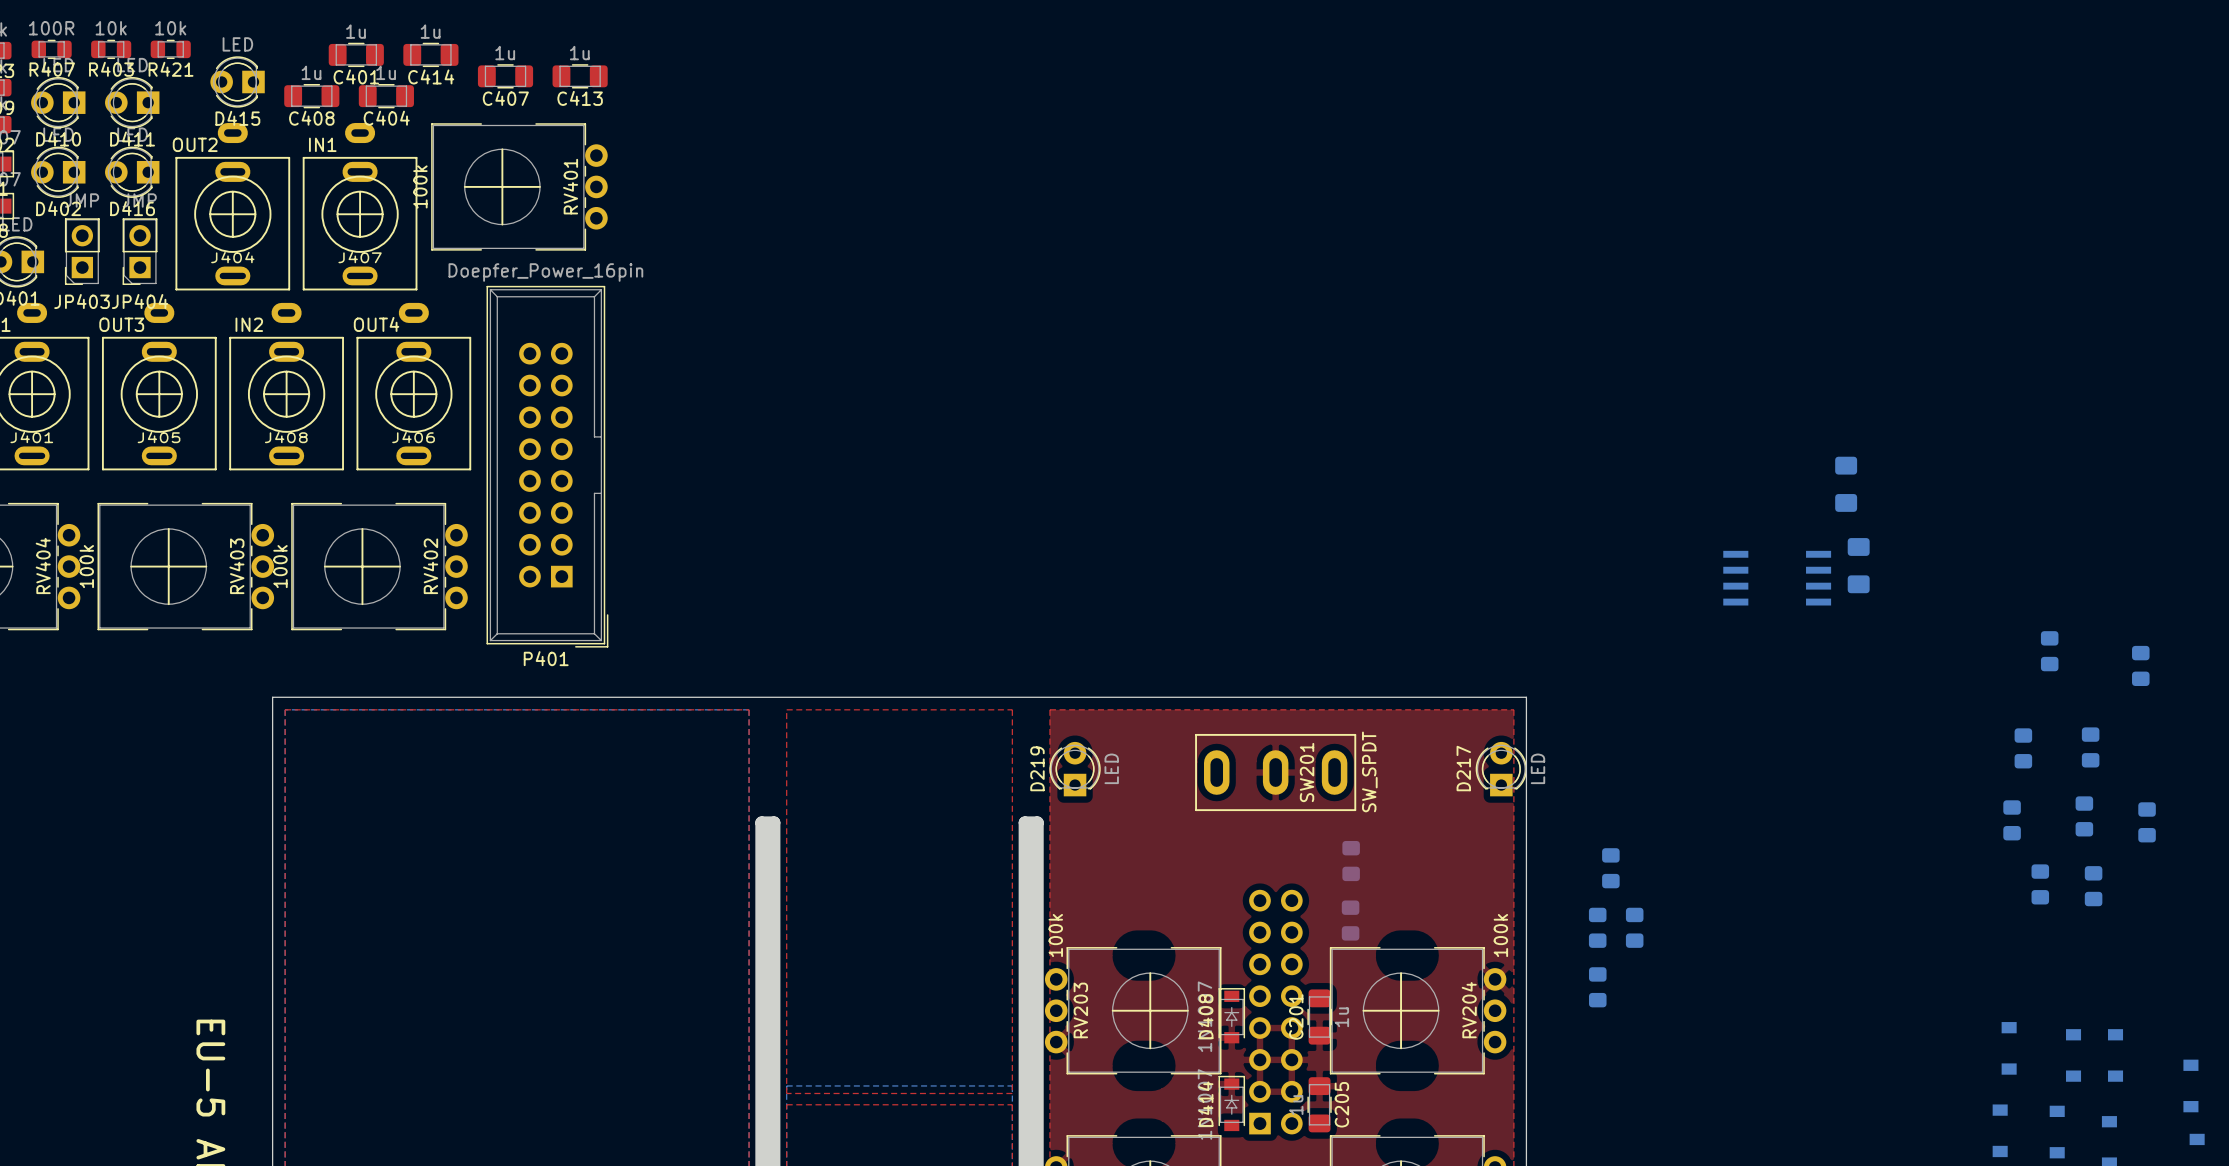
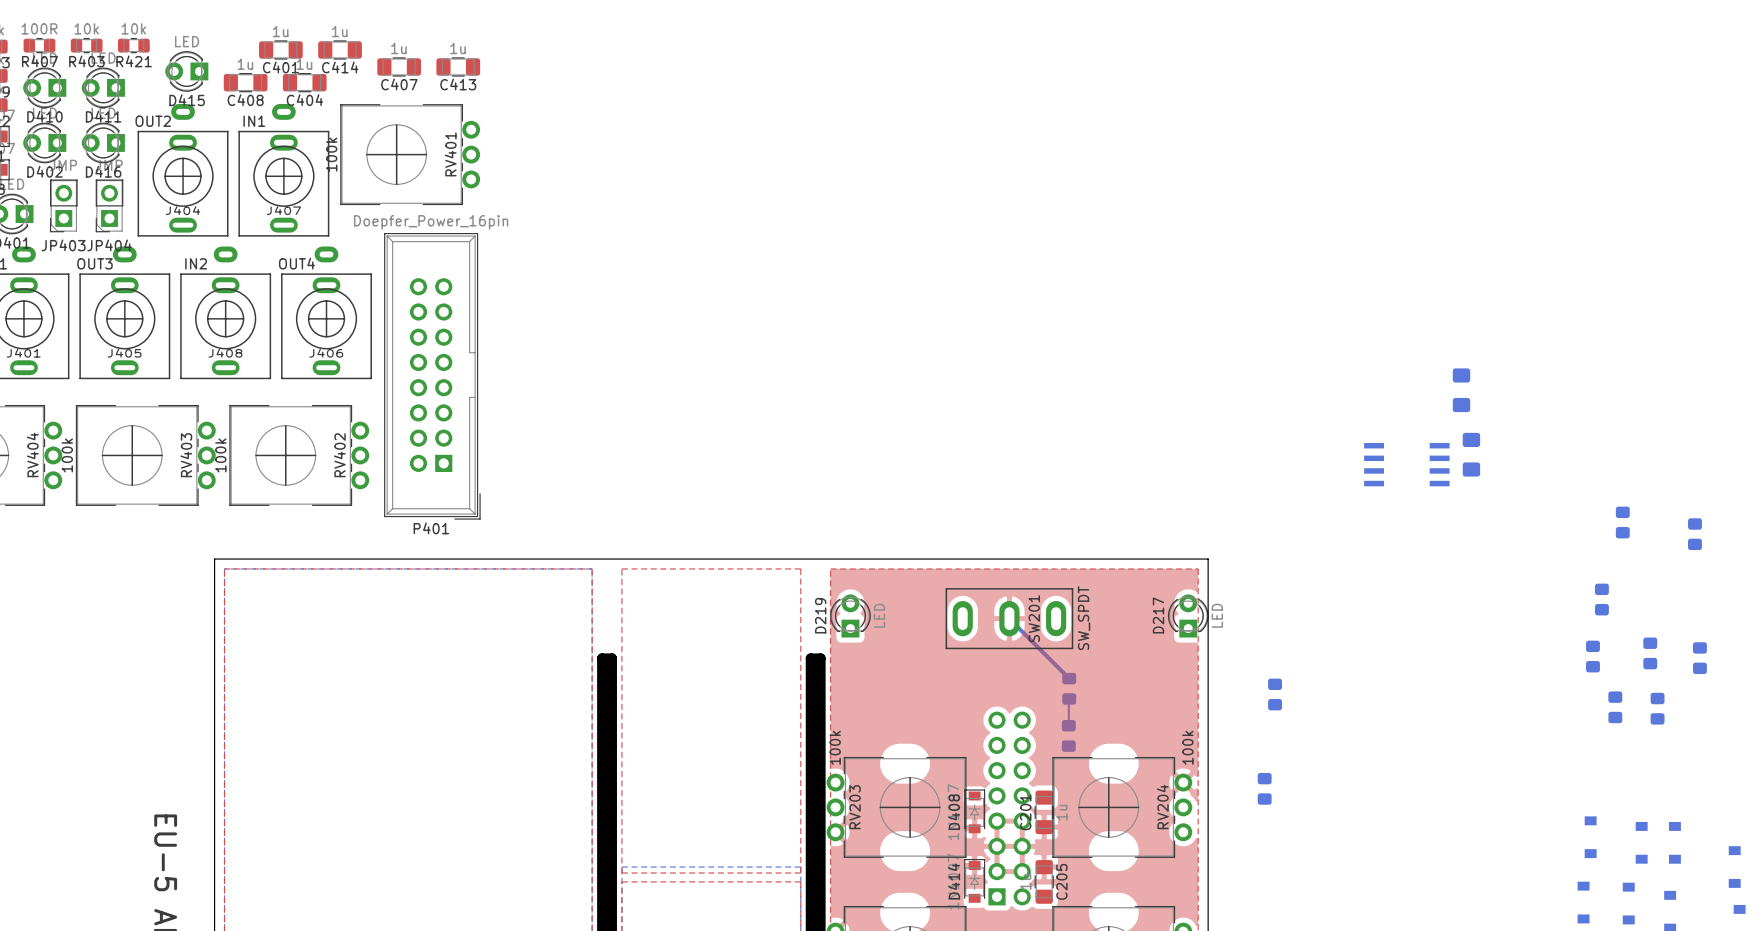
part: (2090, 747) -> none
bottom track: none -> (1009, 618) (1069, 678)
bottom track: none -> (1069, 698) (1068, 725)
part: (1597, 927) -> none
part: (1634, 927) -> none

